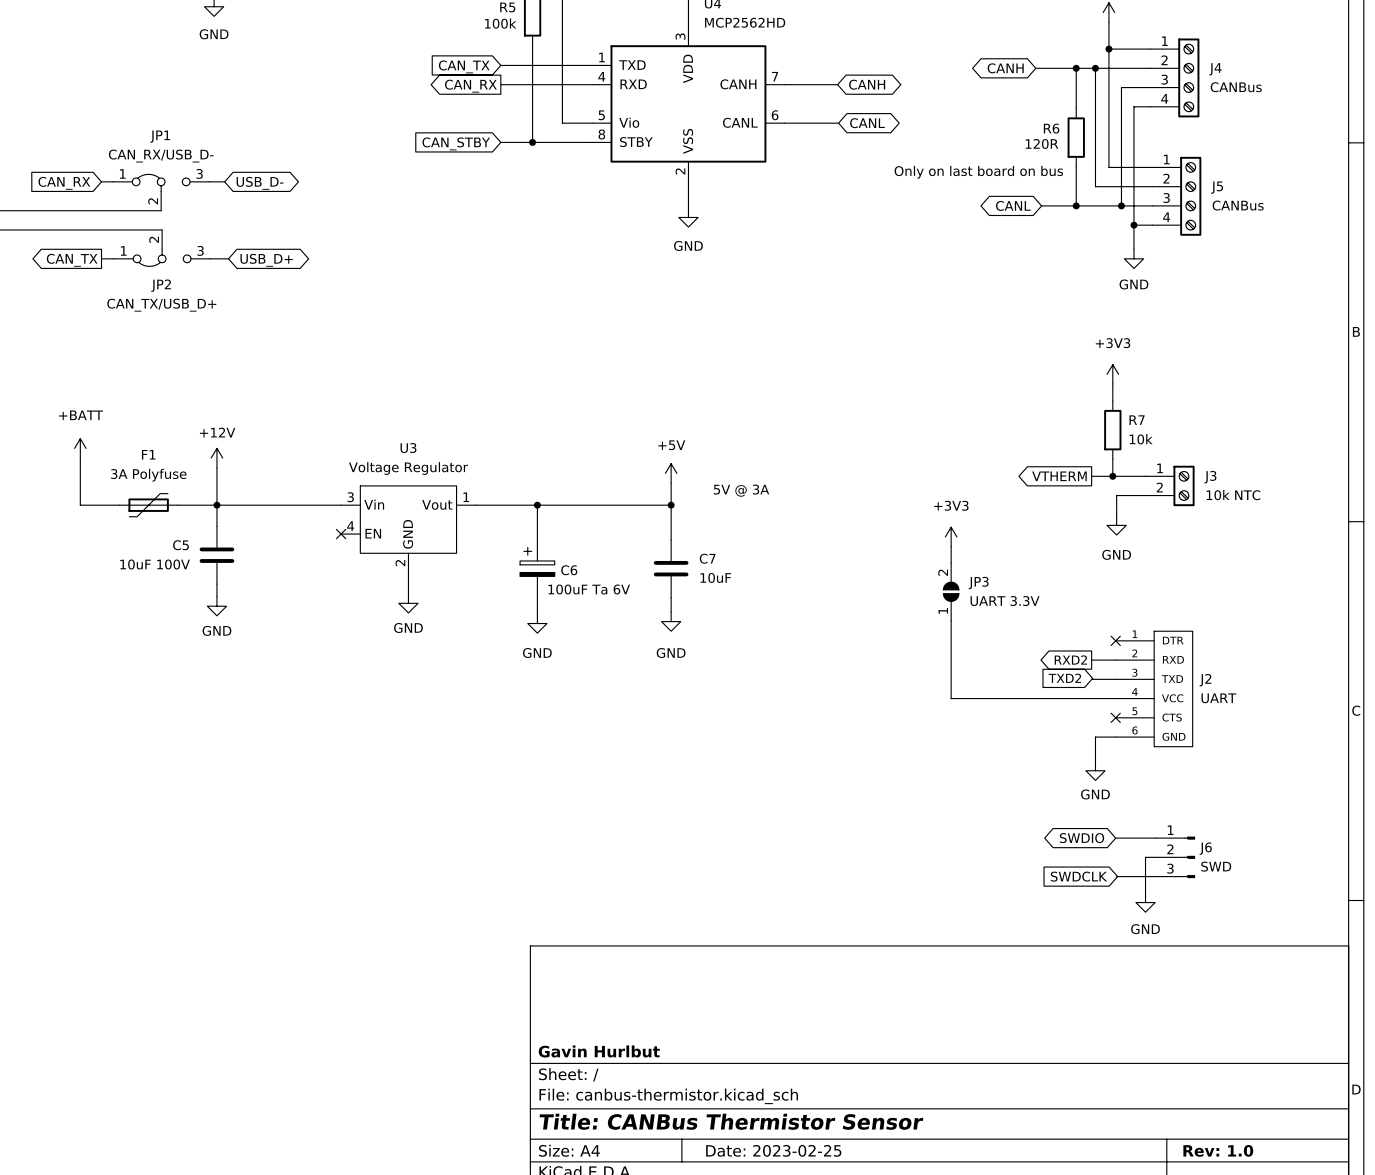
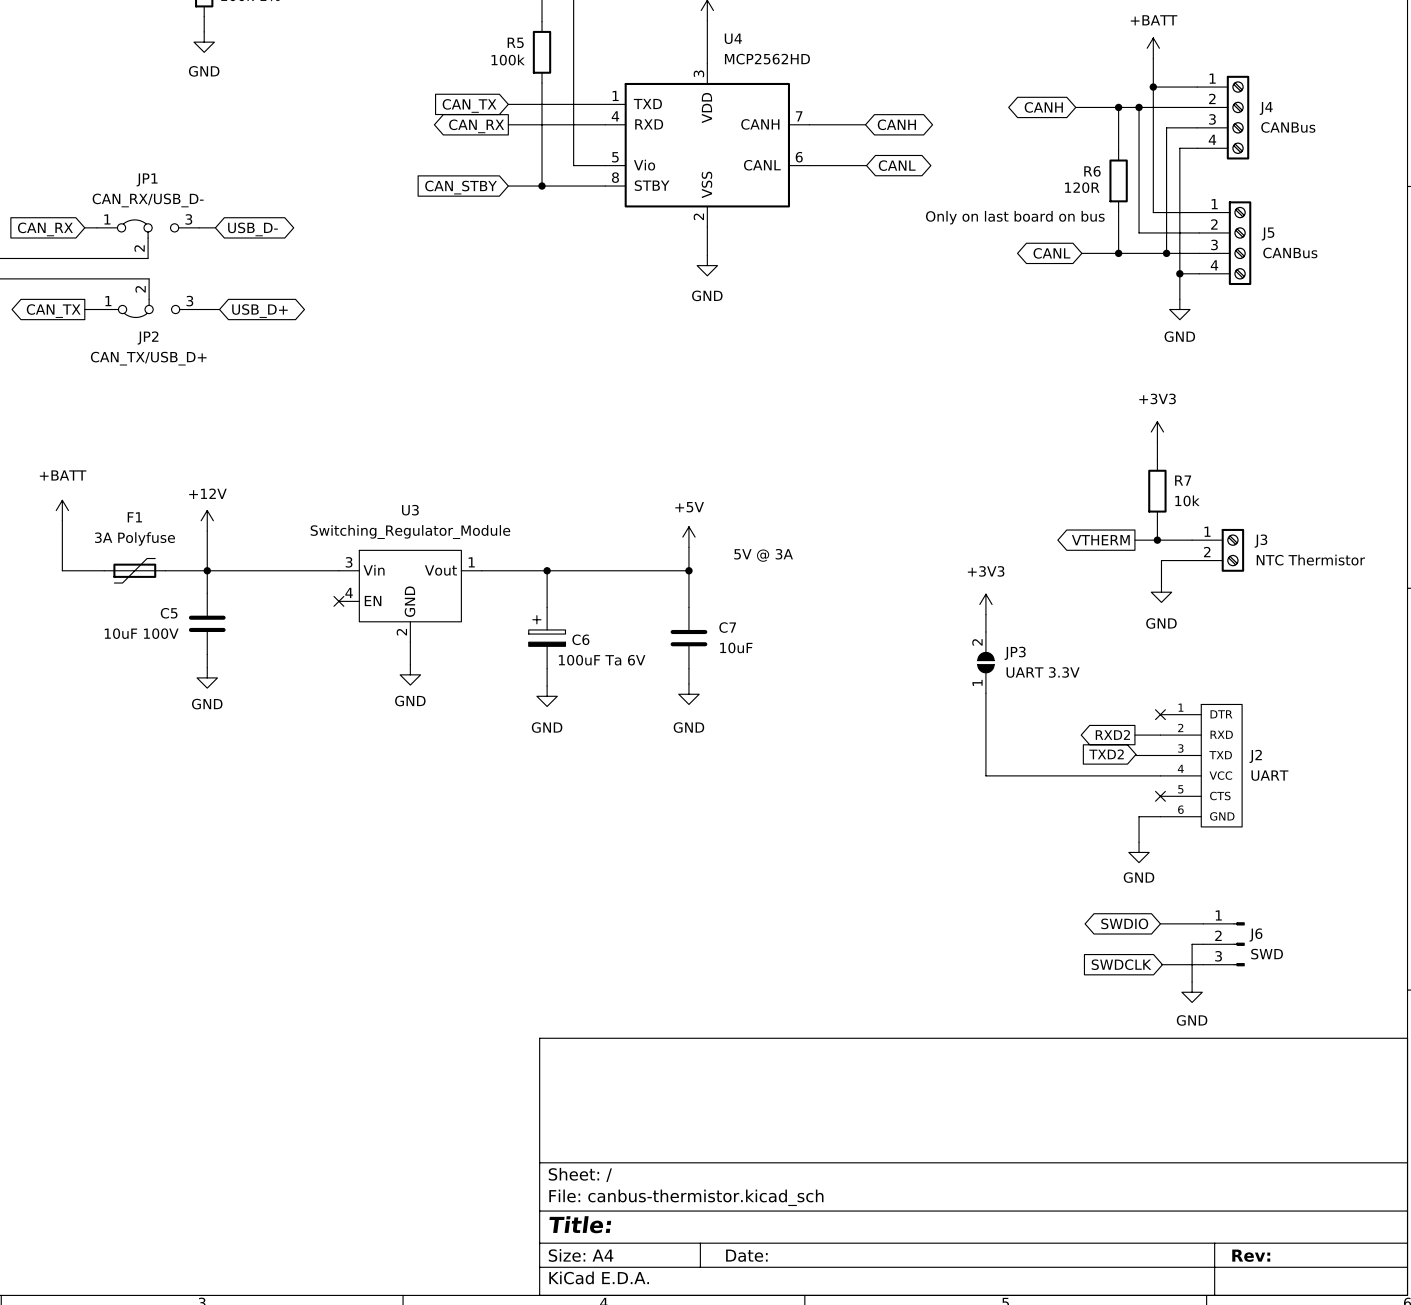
U3 value: Voltage Regulator (408, 468) -> Switching_Regulator_Module (410, 532)
J3 value: 10k NTC (1233, 495) -> NTC Thermistor (1310, 560)
title block: Gavin Hurlbut (599, 1051) -> none
title block: Title: CANBus Thermistor Sensor (731, 1121) -> Title: (580, 1224)
title block: Date: 2023-02-25 (773, 1150) -> Date: (746, 1255)
title block: Rev: 1.0 (1218, 1150) -> Rev: (1251, 1255)

